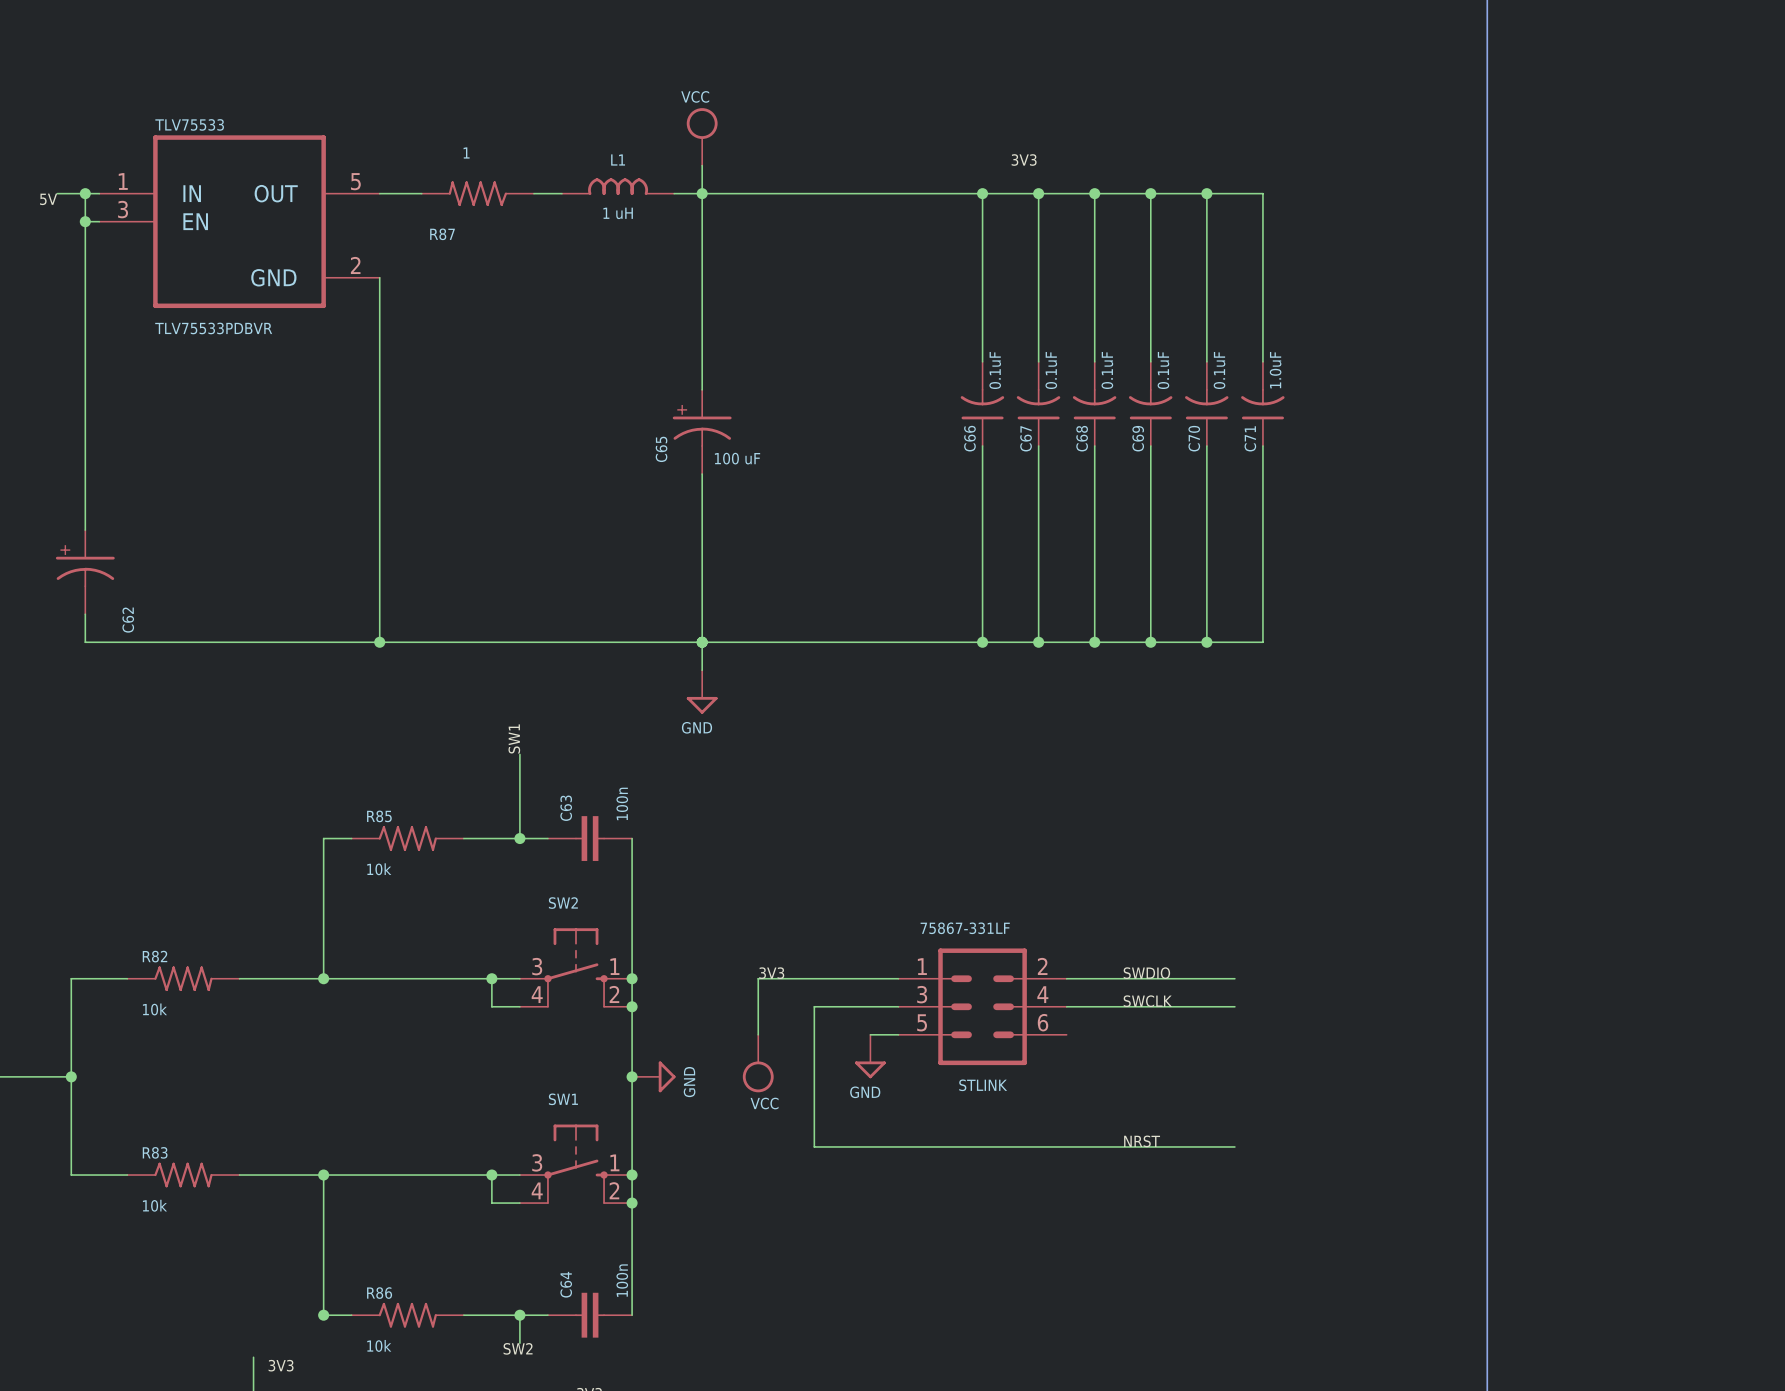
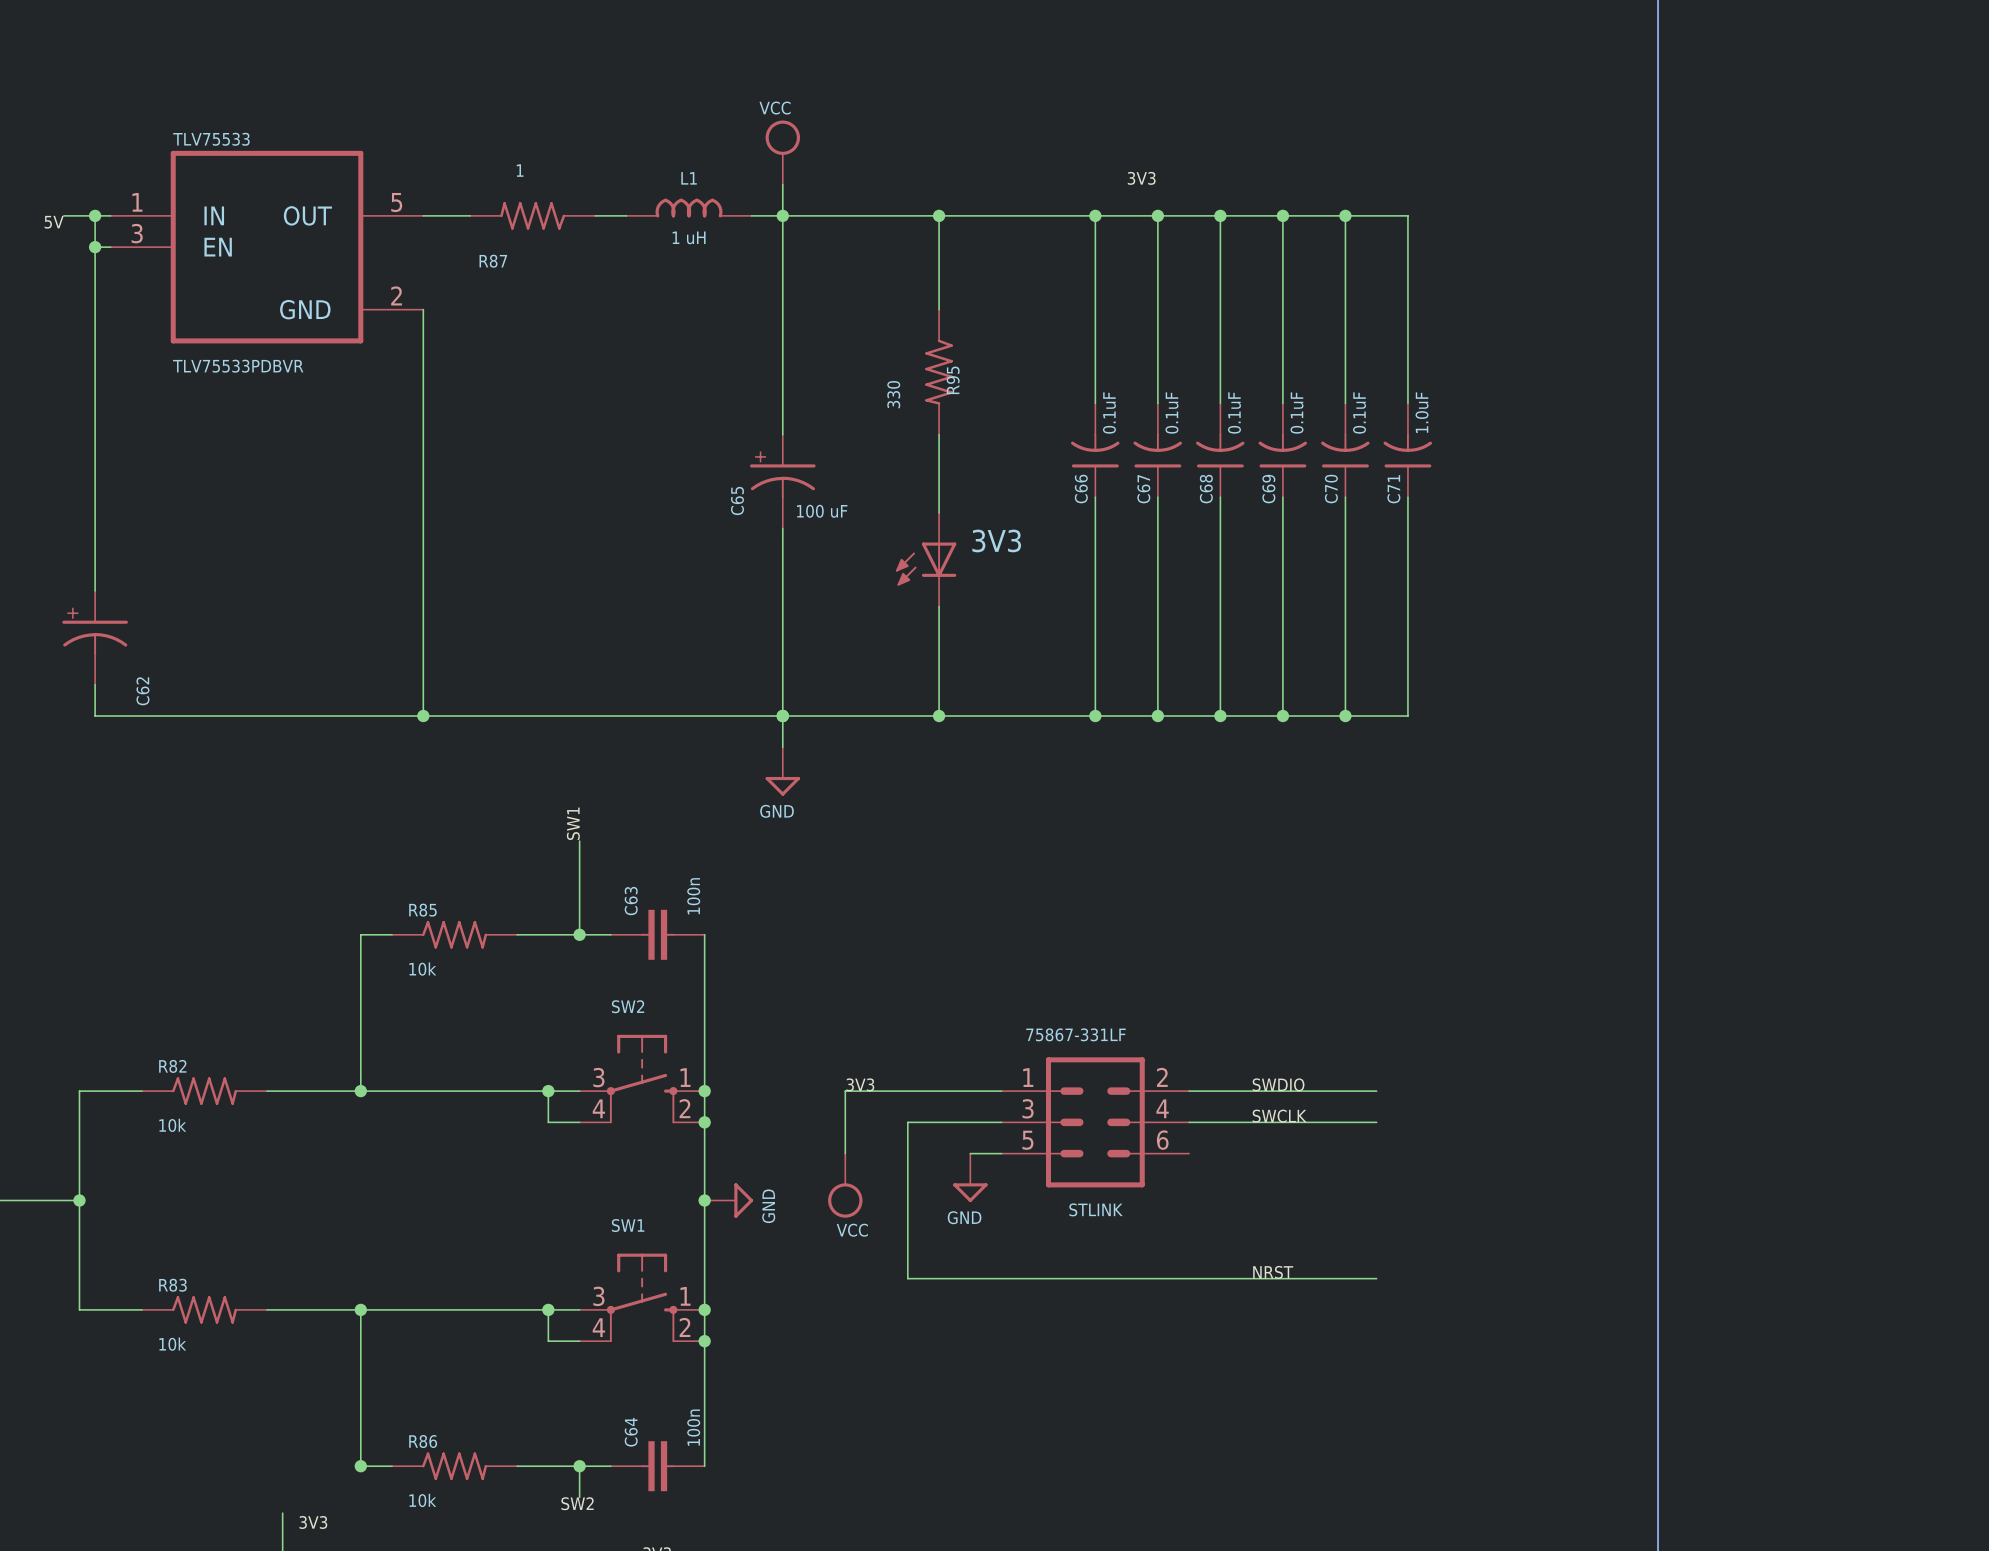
wire: none -> (939, 215) (939, 309)
junction: none -> (939, 215)
R95: none -> 330 (939, 372)
wire: none -> (939, 434) (939, 512)
3V3: none -> (926, 559)
wire: none -> (939, 606) (939, 716)
junction: none -> (939, 716)

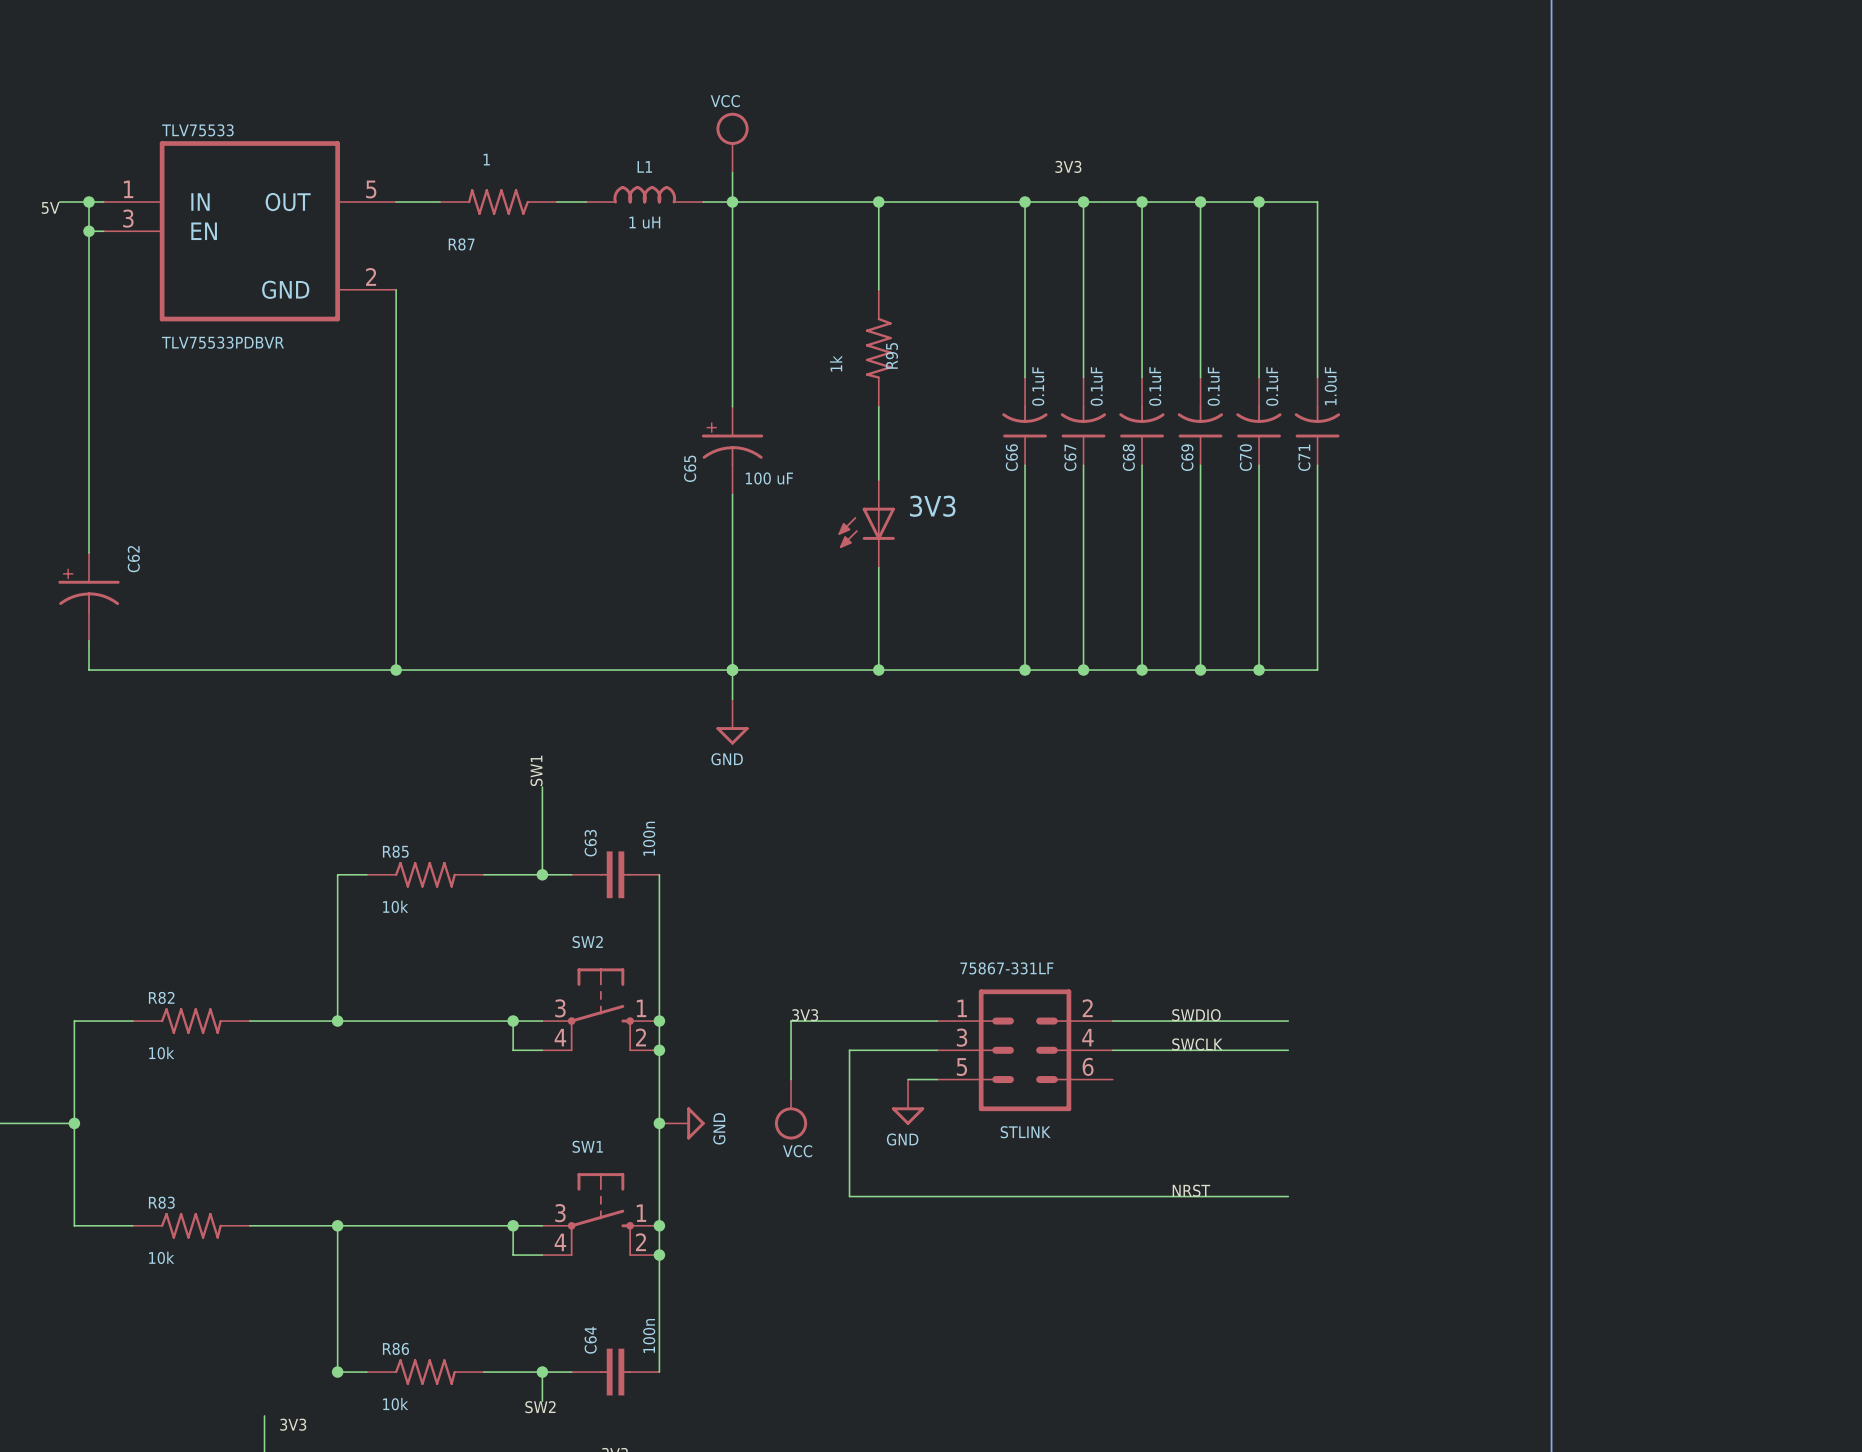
R95 value: 330 (893, 394) -> 1k (836, 363)
C62 name position: C62 (142, 691) -> C62 (133, 559)

